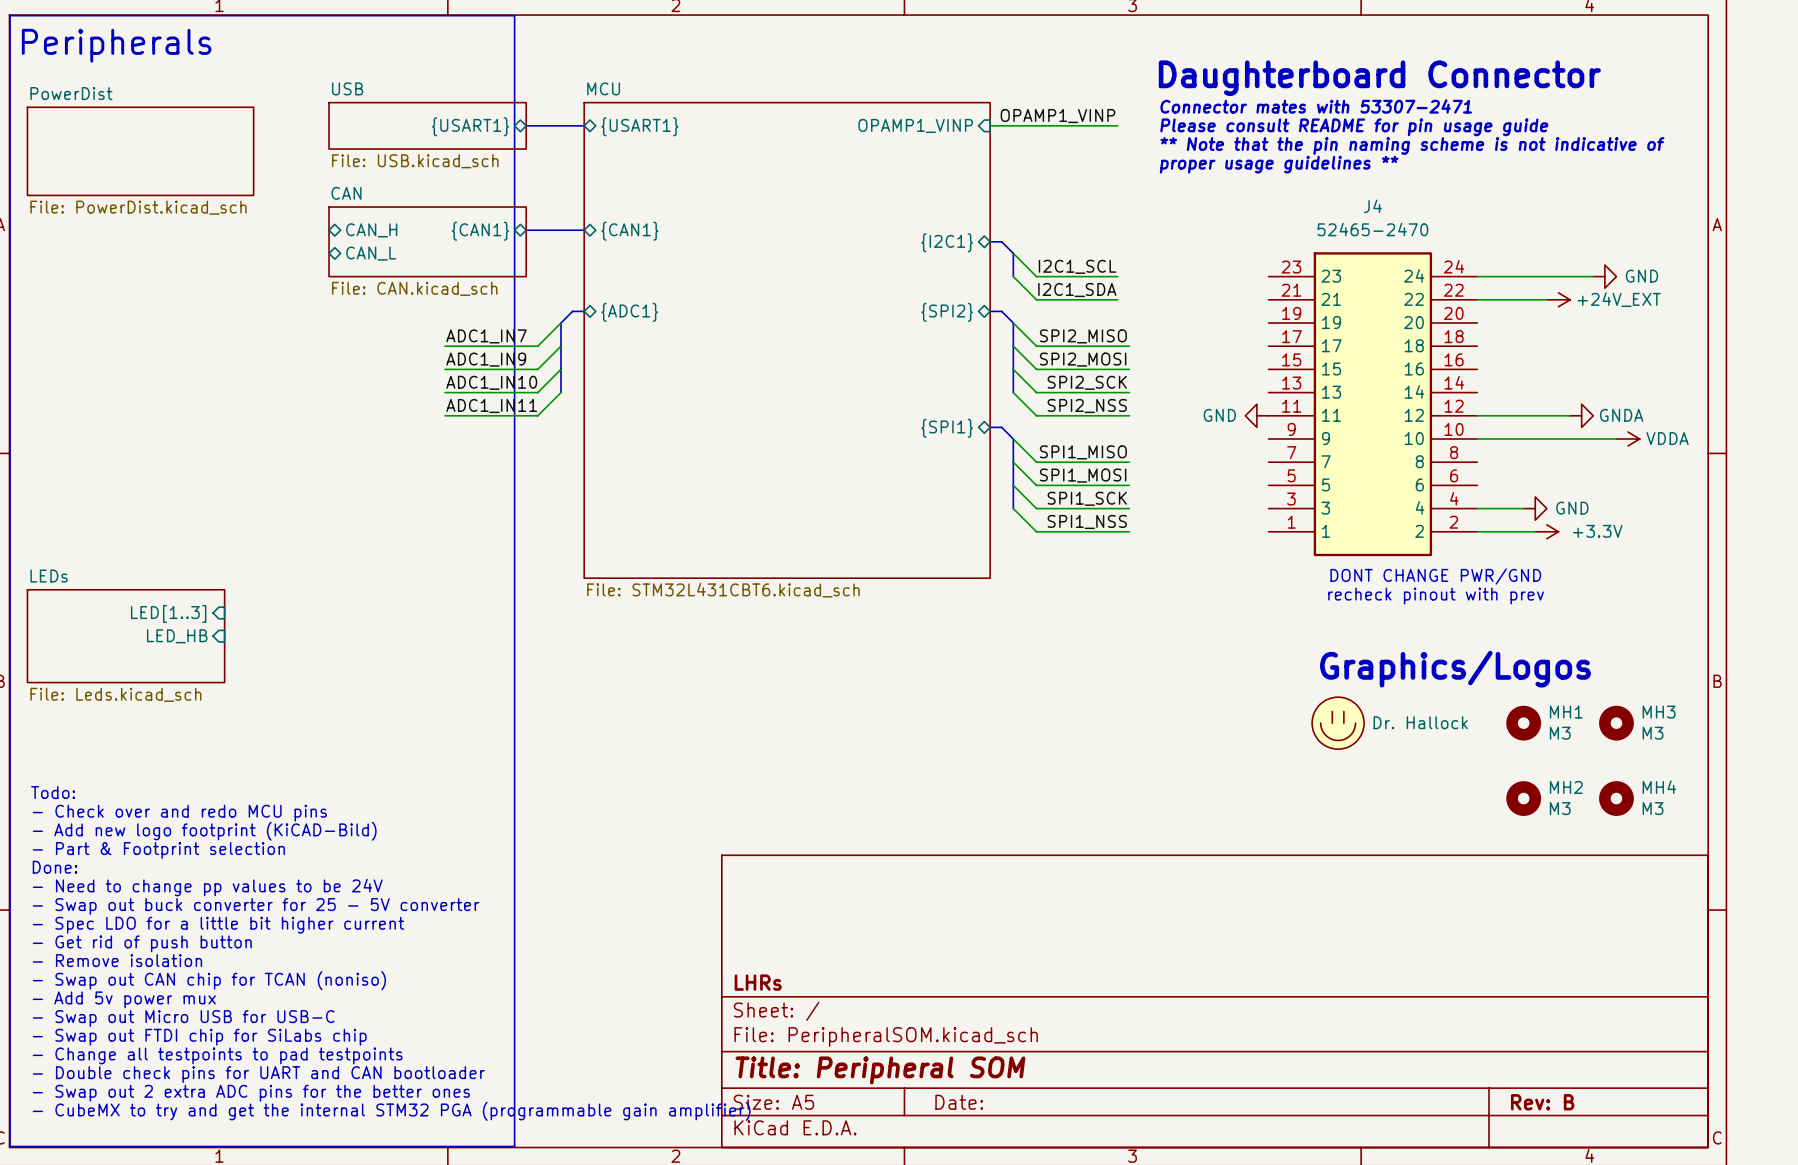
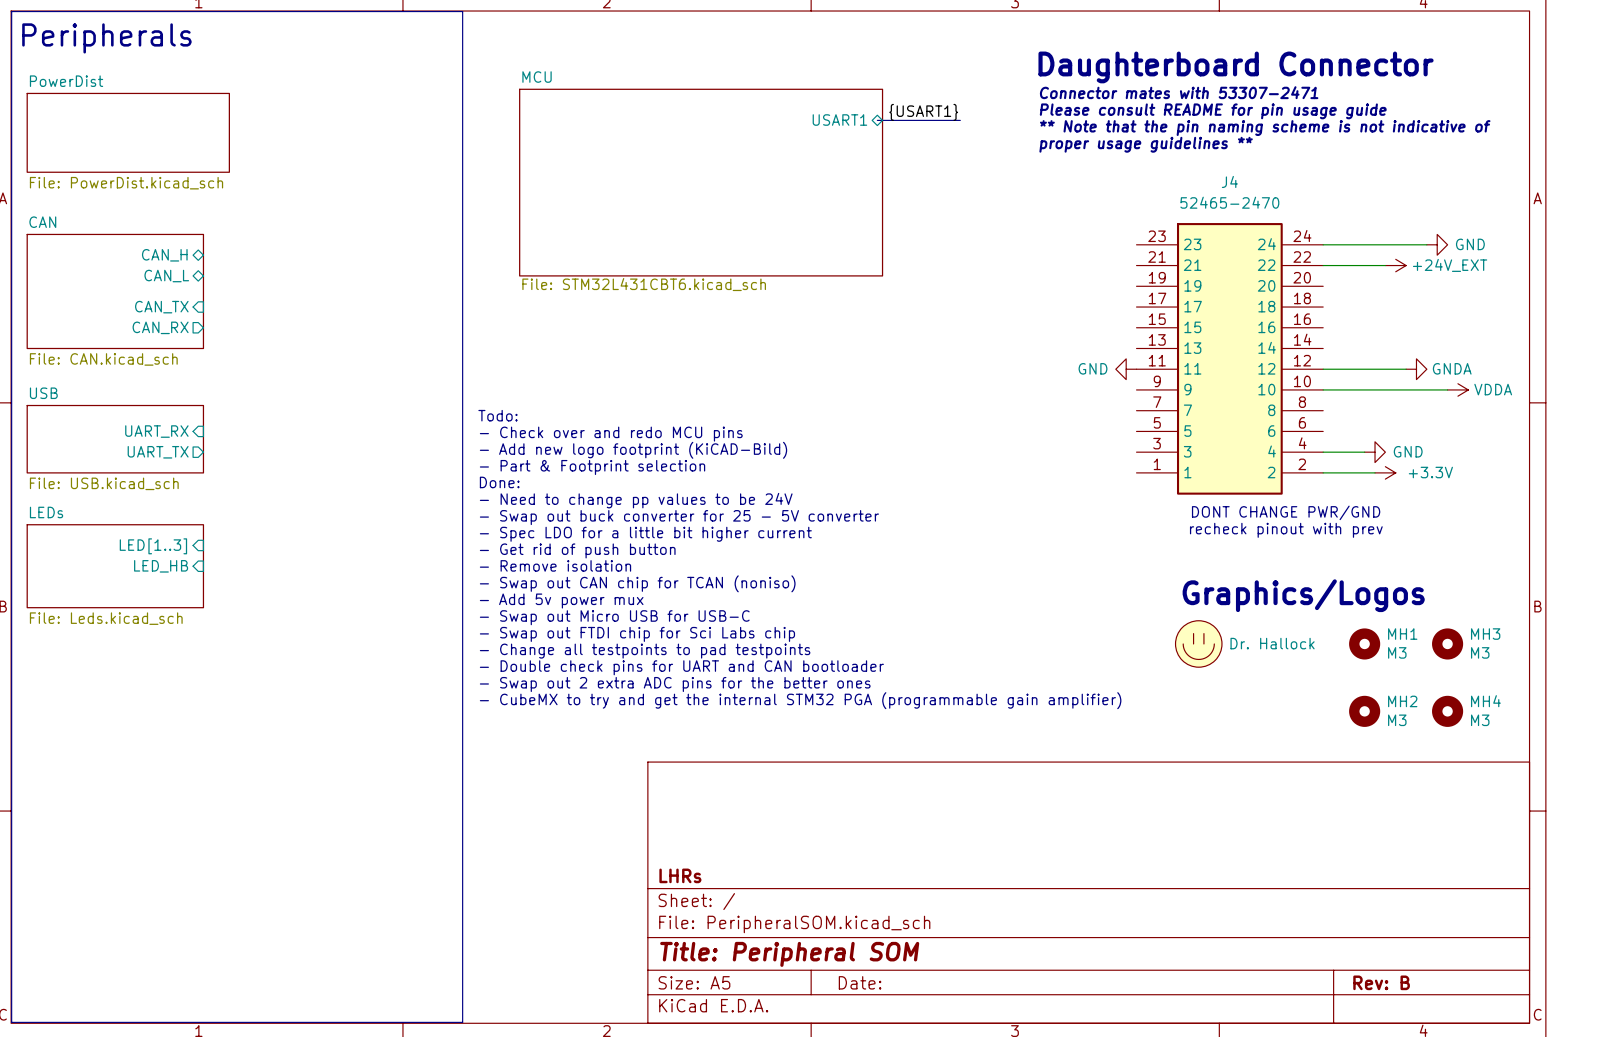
label: OPAMP1_VINP (1057, 116) -> none
sheet USB: File: USB.kicad_sch (427, 125) -> none
bus: (526, 125) (584, 125) -> none
sheet pin: OPAMP1_VINP (915, 125) -> none
wire: (990, 125) (1117, 125) -> none
sheet pin: {USART1} (470, 126) -> none
sheet pin: {USART1} (639, 126) -> none
label: none -> {USART1} (923, 112)
sheet pin: none -> USART1 (839, 120)
bus: none -> (877, 120) (960, 120)
sheet MCU: none -> File: STM32L431CBT6.kicad_sch (701, 182)
sheet pin rotation: 0° (371, 230) -> 180° (164, 255)
sheet pin position: CAN_H (371, 230) -> CAN_H (164, 255)
bus: (526, 230) (584, 230) -> none
sheet pin: {CAN1} (480, 231) -> none
sheet pin: {CAN1} (629, 231) -> none
sheet CAN: File: CAN.kicad_sch (427, 241) -> none
bus: (990, 241) (1001, 241) (1013, 253) (1013, 276) -> none
sheet pin: {I2C1} (947, 242) -> none
sheet pin rotation: 0° (371, 253) -> 180° (166, 276)
sheet pin position: CAN_L (371, 253) -> CAN_L (166, 276)
wire: (1013, 253) (1036, 276) (1117, 276) -> none
label: I2C1_SCL (1077, 266) -> none
wire: (1013, 276) (1036, 299) (1117, 299) -> none
label: I2C1_SDA (1077, 290) -> none
bus: (584, 311) (572, 311) (560, 323) (560, 392) -> none
bus: (990, 311) (1001, 311) (1013, 323) (1013, 392) -> none
sheet pin: {ADC1} (629, 312) -> none
sheet pin: {SPI2} (947, 312) -> none
wire: (560, 323) (537, 346) (445, 346) -> none
wire: (1013, 323) (1036, 346) (1129, 346) -> none
sheet CAN: none -> File: CAN.kicad_sch (115, 291)
label: ADC1_IN7 (486, 336) -> none
label: SPI2_MISO (1083, 336) -> none
sheet MCU: File: STM32L431CBT6.kicad_sch (787, 340) -> none
sheet pin: none -> CAN_TX (161, 307)
wire: (560, 346) (537, 369) (445, 369) -> none
wire: (1013, 346) (1036, 369) (1129, 369) -> none
label: ADC1_IN9 (486, 359) -> none
label: SPI2_MOSI (1083, 359) -> none
sheet pin: none -> CAN_RX (160, 327)
wire: (560, 369) (537, 392) (445, 392) -> none
wire: (1013, 369) (1036, 392) (1129, 392) -> none
label: ADC1_IN10 (491, 382) -> none
label: SPI2_SCK (1087, 382) -> none
wire: (560, 392) (537, 415) (445, 415) -> none
wire: (1013, 392) (1036, 415) (1129, 415) -> none
label: ADC1_IN11 (491, 406) -> none
label: SPI2_NSS (1087, 406) -> none
bus: (990, 427) (1001, 427) (1013, 438) (1013, 508) -> none
sheet pin: {SPI1} (947, 428) -> none
wire: (1013, 438) (1036, 462) (1129, 462) -> none
label: SPI1_MISO (1083, 452) -> none
wire: (1013, 462) (1036, 485) (1129, 485) -> none
text: none -> Todo: (497, 415)
label: SPI1_MOSI (1083, 475) -> none
sheet pin: none -> UART_RX (156, 431)
wire: (1013, 485) (1036, 508) (1129, 508) -> none
text: none -> - Check over and redo MCU pins (611, 434)
sheet USB: none -> File: USB.kicad_sch (115, 439)
label: SPI1_SCK (1087, 498) -> none
text: none -> - Add new logo footprint (KiCAD-Bild) (633, 450)
sheet pin: none -> UART_TX (158, 452)
wire: (1013, 508) (1036, 531) (1129, 531) -> none
label: SPI1_NSS (1087, 521) -> none
text: none -> - Part & Footprint selection (592, 467)
text: none -> Done: (499, 482)
text: none -> - Need to change pp values to be 24V (636, 500)
text: none -> - Swap out buck converter for 25 - 5V converter (679, 517)
text: none -> - Spec LDO for a little bit higher current (645, 534)
text: none -> - Get rid of push button (577, 550)
text: none -> - Remove isolation (555, 565)
text: none -> - Swap out CAN chip for TCAN (noniso) (637, 583)
text: none -> - Add 5v power mux (561, 601)
text: none -> - Swap out Micro USB for USB-C (614, 617)
text: none -> - Swap out FTDI chip for Sci Labs chip (637, 634)
text: none -> - Change all testpoints to pad testpoints (645, 651)
text: none -> - Double check pins for UART and CAN bootloader (681, 667)
text: none -> - Swap out 2 extra ADC pins for the better ones (675, 684)
text: none -> - CubeMX to try and get the internal STM32 PGA (programmable gain amplifier) (800, 700)
text: Todo: (53, 792) -> none
text: - Check over and redo MCU pins (179, 813) -> none
text: - Add new logo footprint (KiCAD-Bild) (204, 831) -> none
text: - Part & Footprint selection (158, 850) -> none
text: Done: (54, 867) -> none
text: - Need to change pp values to be 24V (207, 887) -> none
text: - Swap out buck converter for 25 - 5V converter (256, 906) -> none
text: - Spec LDO for a little bit higher current (218, 925) -> none
text: - Get rid of push button (142, 943) -> none
text: - Remove isolation (117, 960) -> none
text: - Swap out CAN chip for TCAN (noniso) (209, 980) -> none
text: - Add 5v power mux (124, 999) -> none
text: - Swap out Micro USB for USB-C (183, 1018) -> none
text: - Swap out FTDI chip for SiLabs chip (199, 1037) -> none
text: - Change all testpoints to pad testpoints (217, 1055) -> none
text: - Double check pins for UART and CAN bootloader (258, 1074) -> none
text: - Swap out 2 extra ADC pins for the better ones (251, 1093) -> none
text: - CubeMX to try and get the internal STM32 PGA (programmable gain amplifier) (391, 1111) -> none

